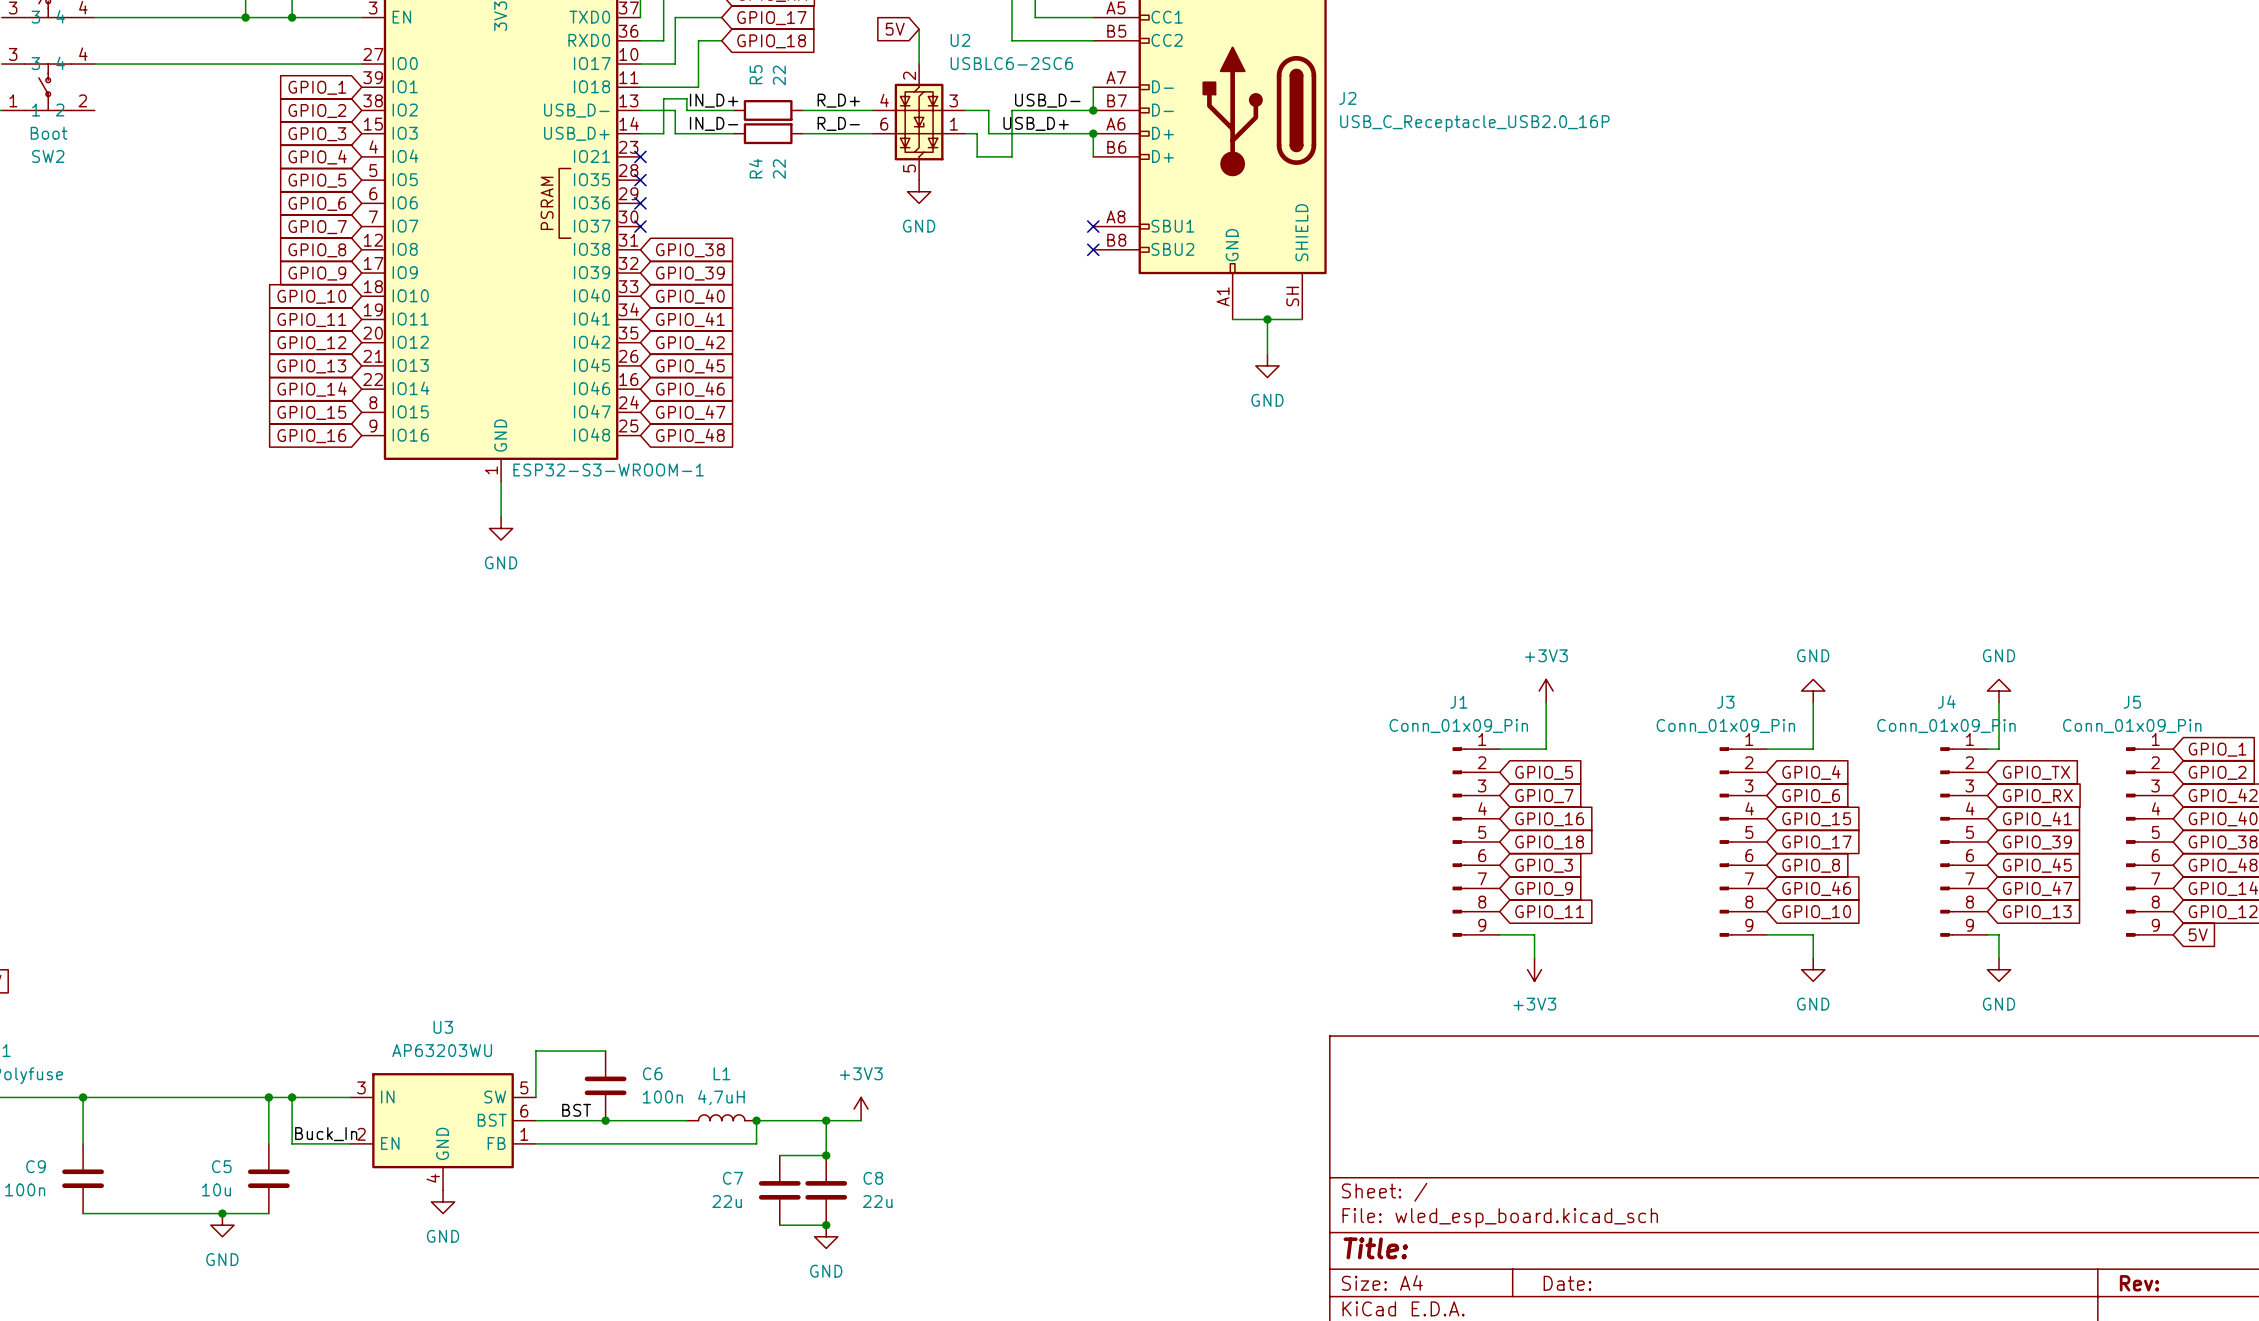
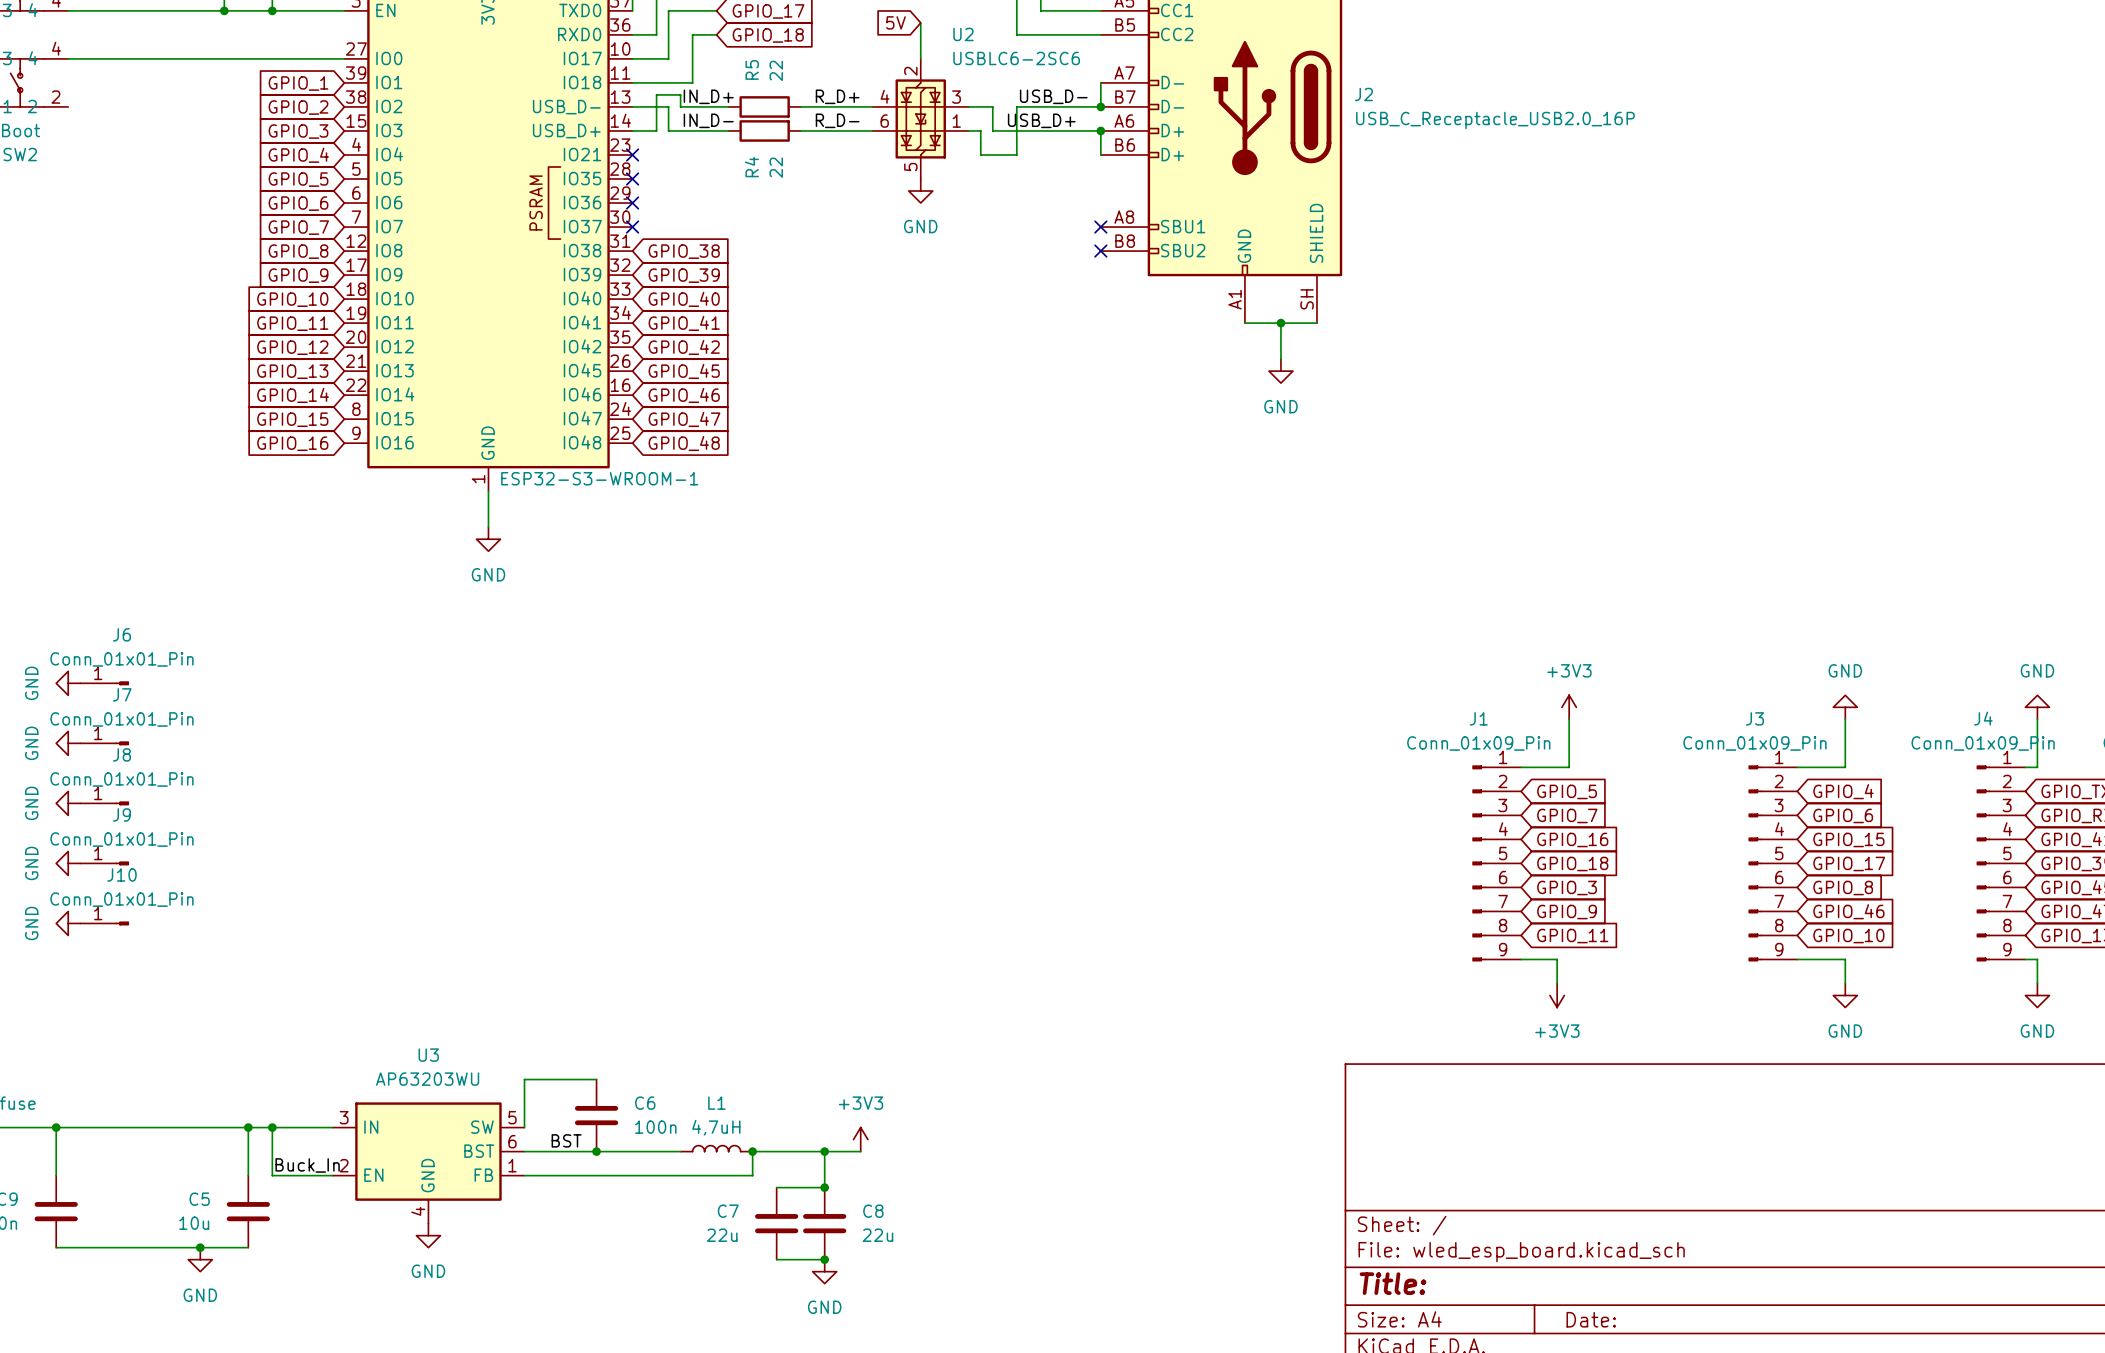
power symbol: none -> GND (68, 683)
J6: none -> Conn_01x01_Pin (104, 683)
power symbol: none -> GND (68, 743)
J7: none -> Conn_01x01_Pin (104, 743)
power symbol: none -> GND (68, 803)
J8: none -> Conn_01x01_Pin (104, 803)
power symbol: none -> GND (68, 863)
J9: none -> Conn_01x01_Pin (104, 863)
power symbol: none -> GND (68, 923)
J10: none -> Conn_01x01_Pin (104, 923)

